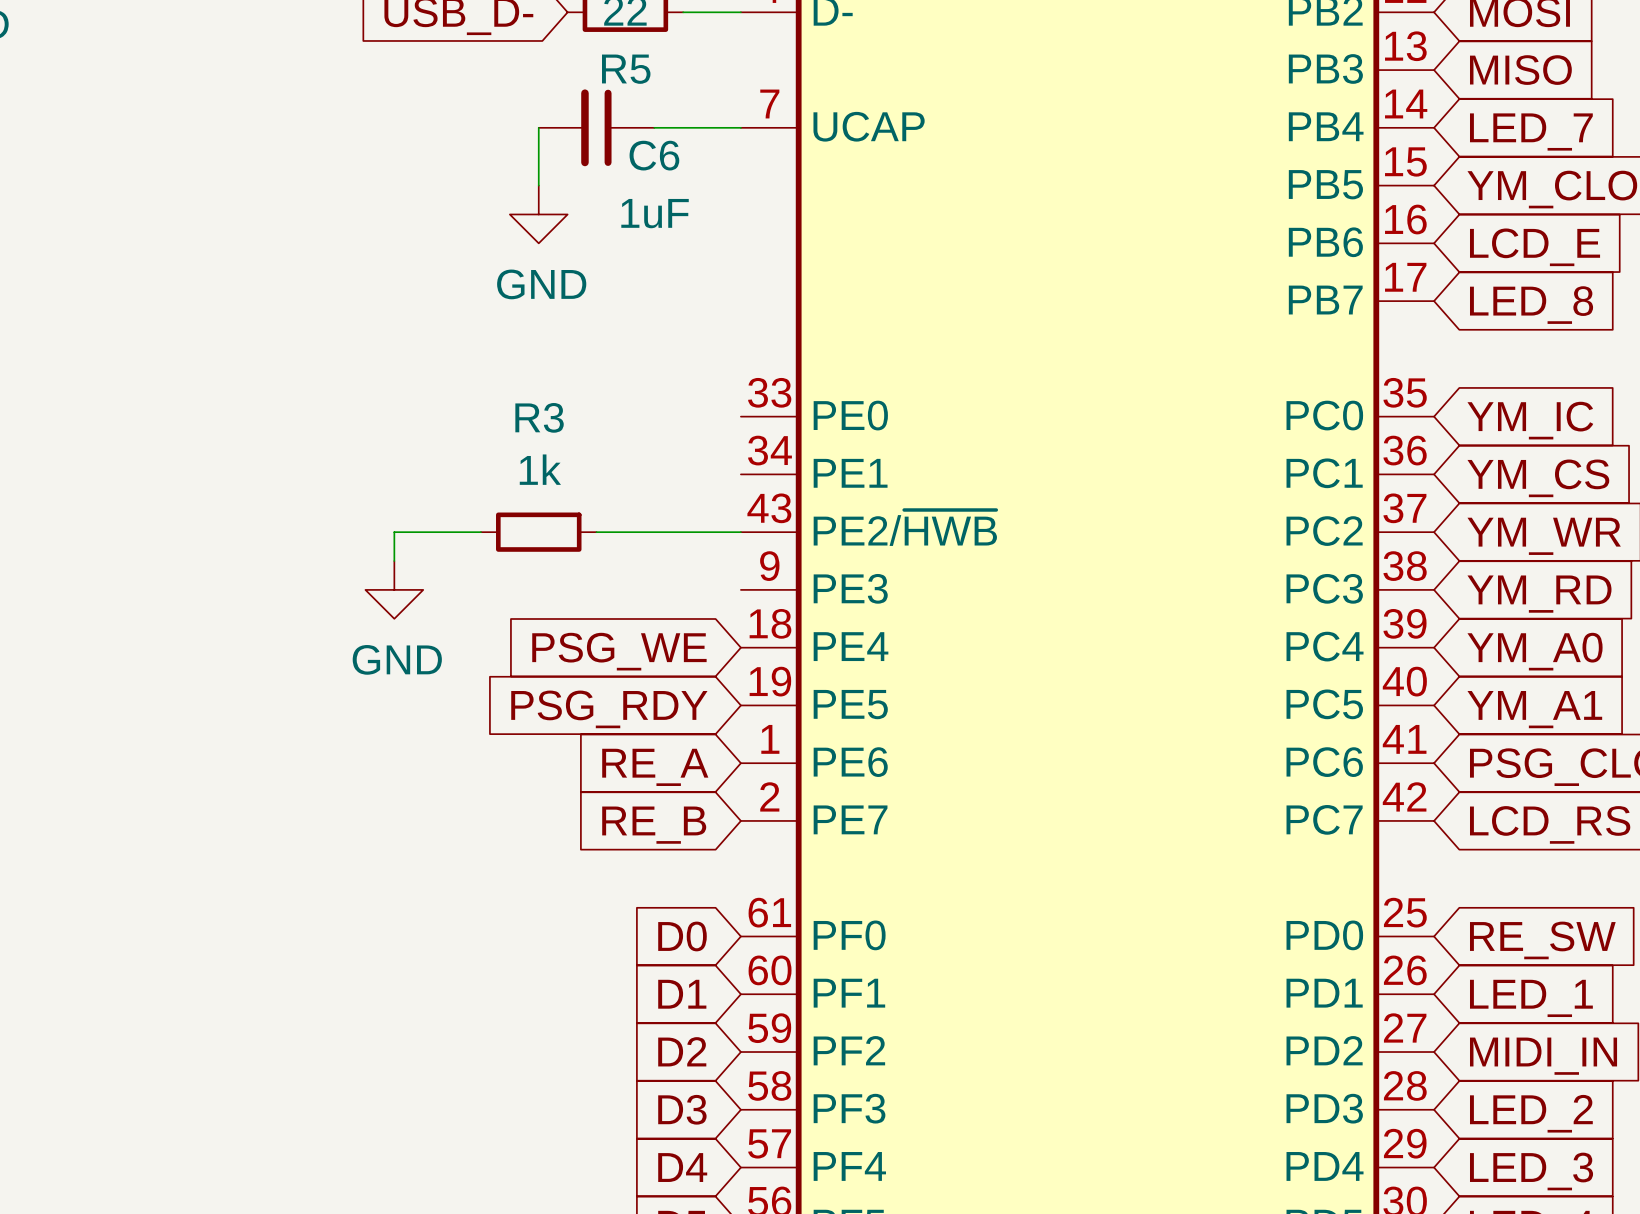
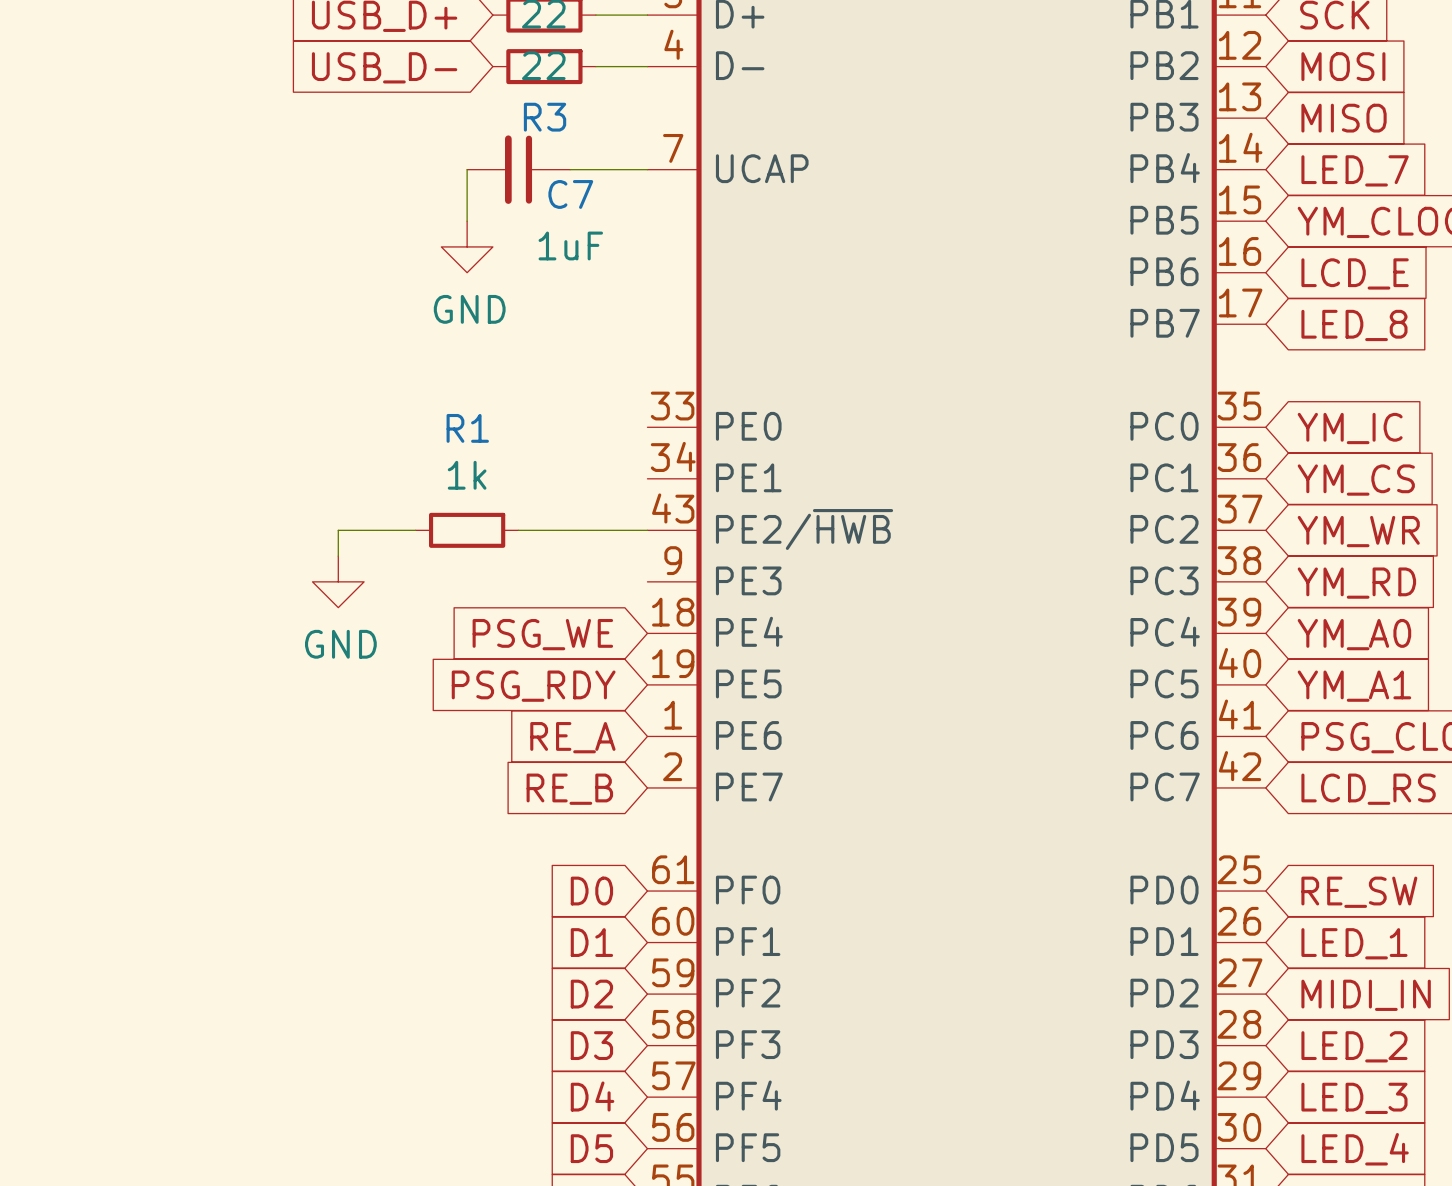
R5 name: R5 (626, 69) -> R3 (545, 117)
C6 name: C6 (654, 155) -> C7 (570, 194)
R3 name: R3 (539, 417) -> R1 (467, 428)

